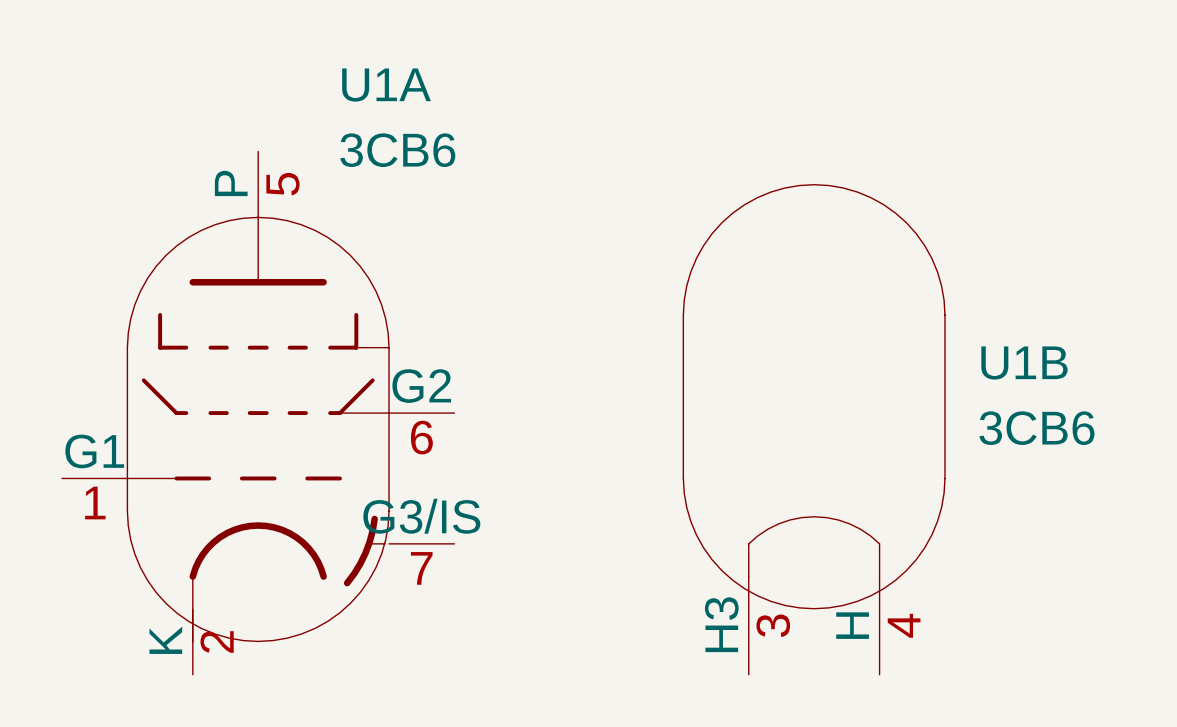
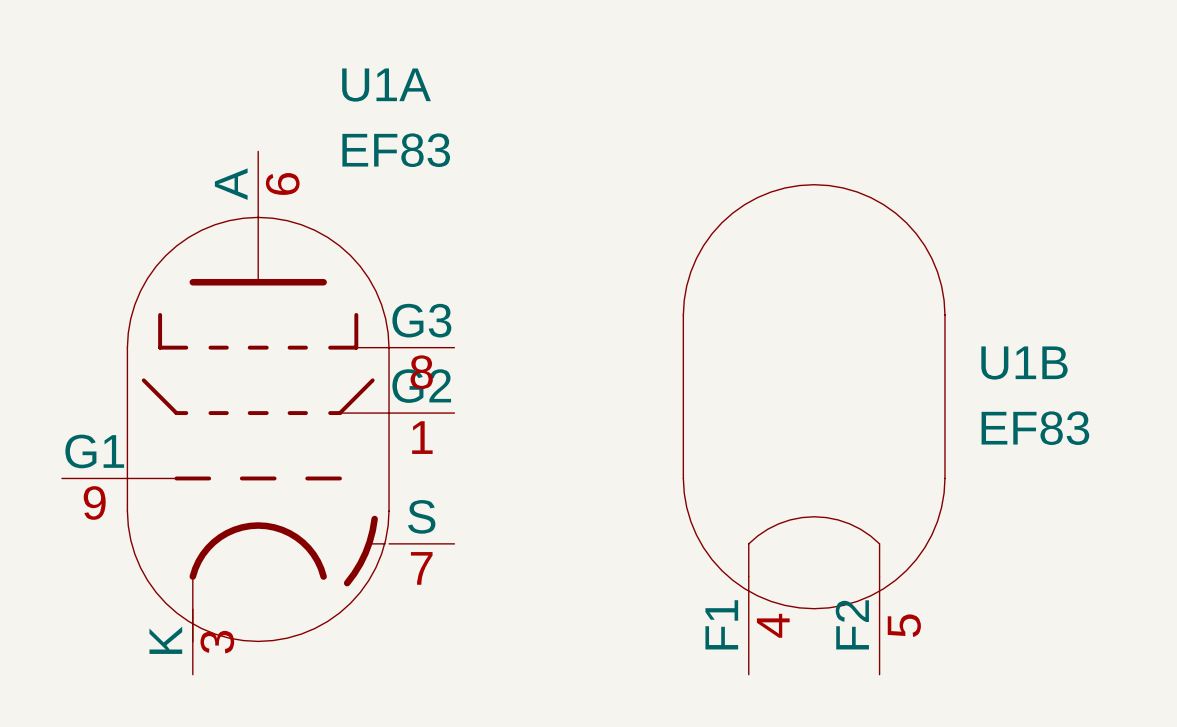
U1A value: 3CB6 (397, 150) -> EF83 (396, 150)
U1A symbol: [61, 151, 455, 675] -> [61, 151, 455, 675]
U1B value: 3CB6 (1036, 428) -> EF83 (1035, 428)
U1B pin name: H3 (721, 624) -> F1 (721, 624)
U1B pin number: 3 (773, 625) -> 4 (773, 625)
U1B pin name: H (852, 625) -> F2 (852, 624)
U1B pin number: 4 (904, 625) -> 5 (904, 625)

